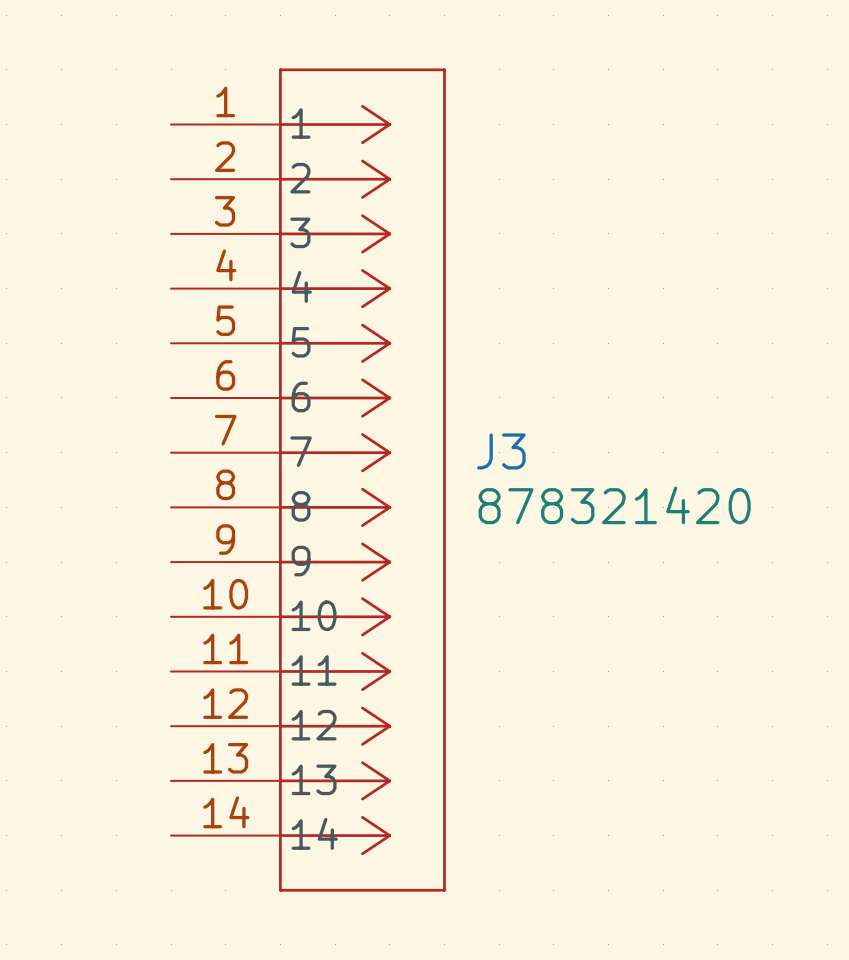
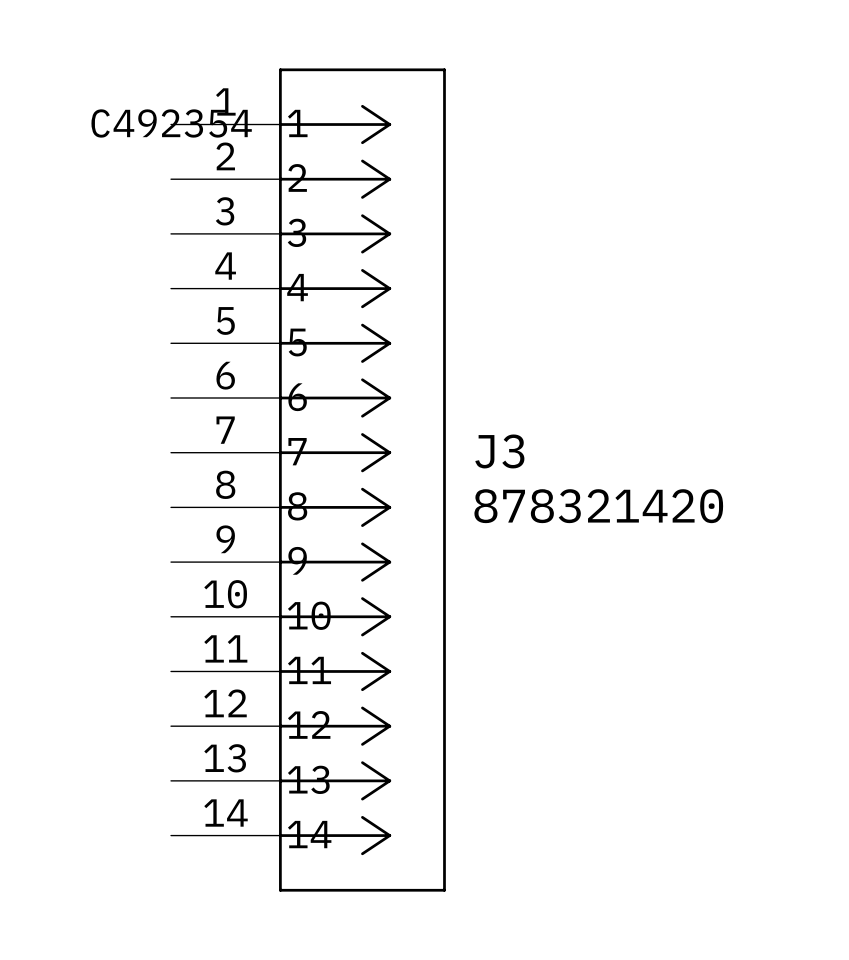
J3 text: none -> C492354 (171, 123)

